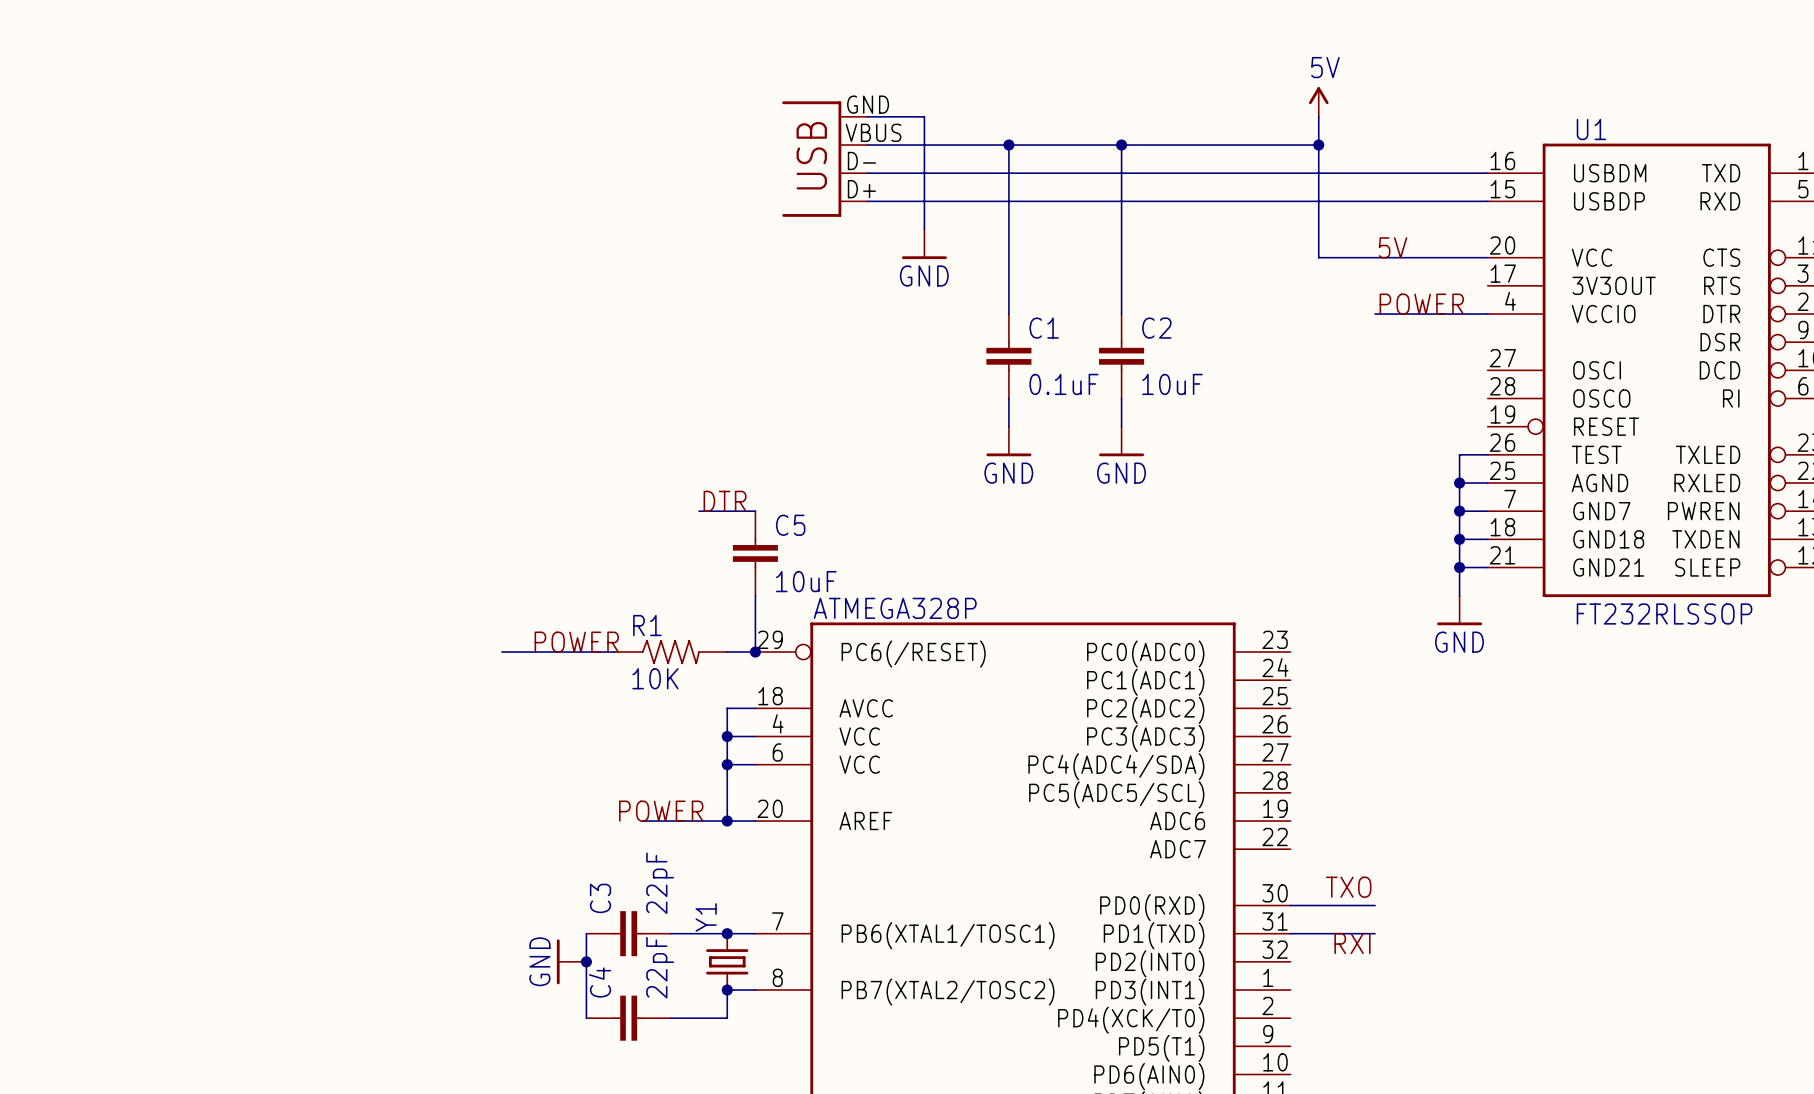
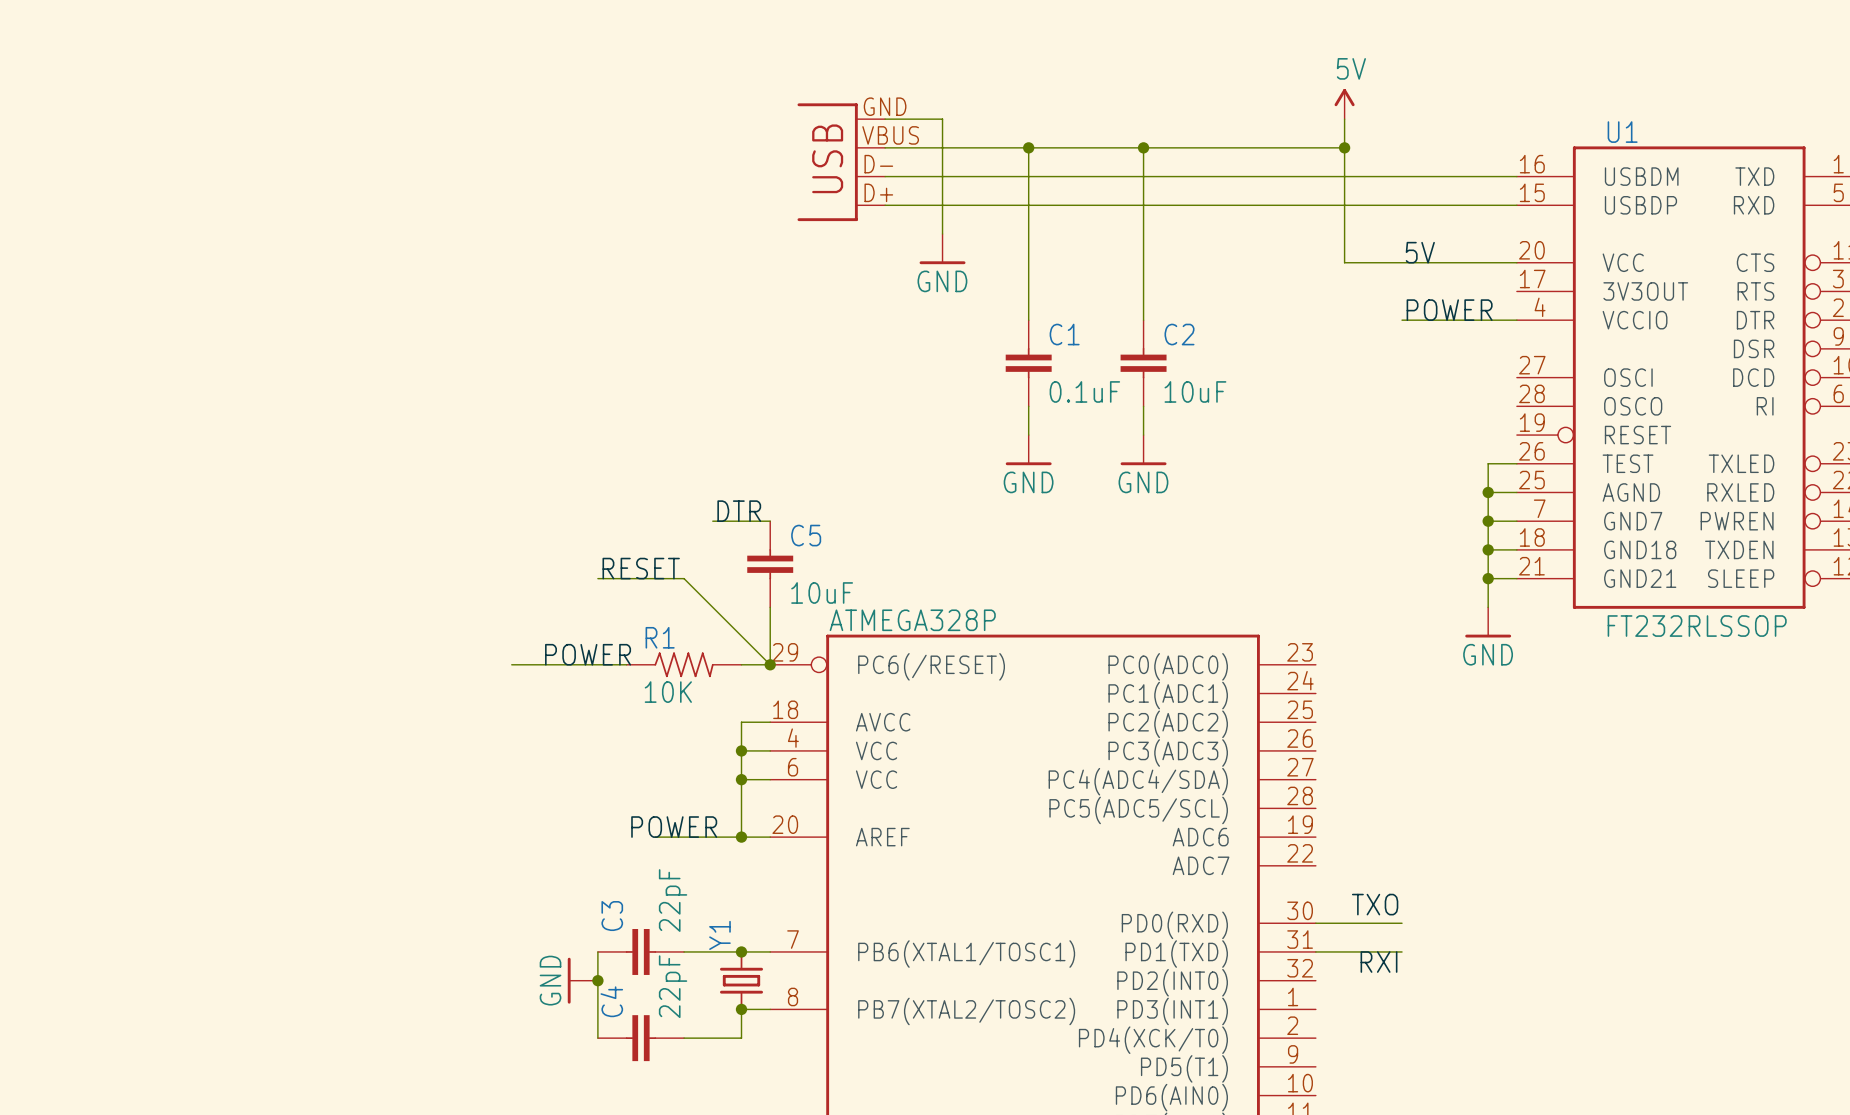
label: none -> RESET (641, 568)
wire: none -> (597, 578) (684, 578) (770, 664)

